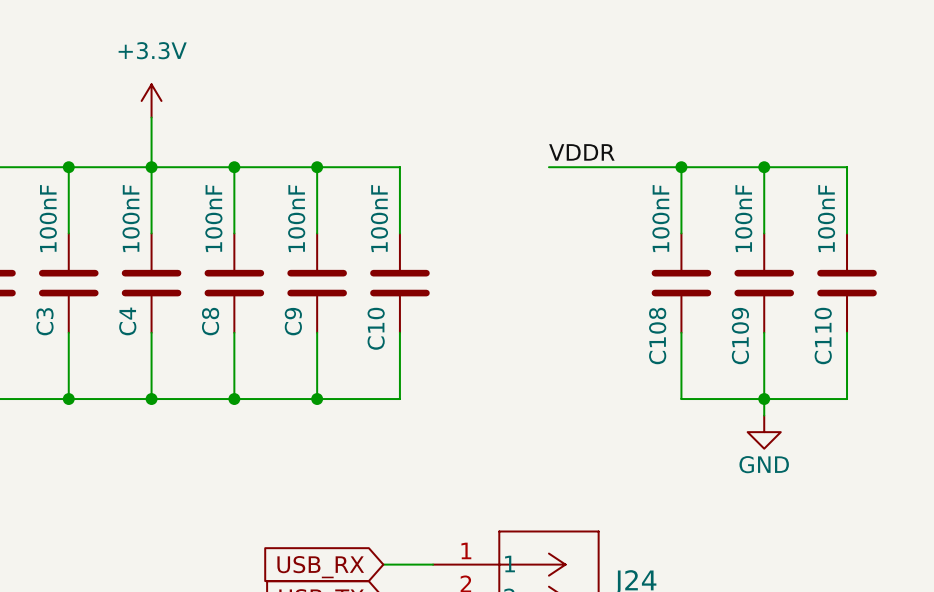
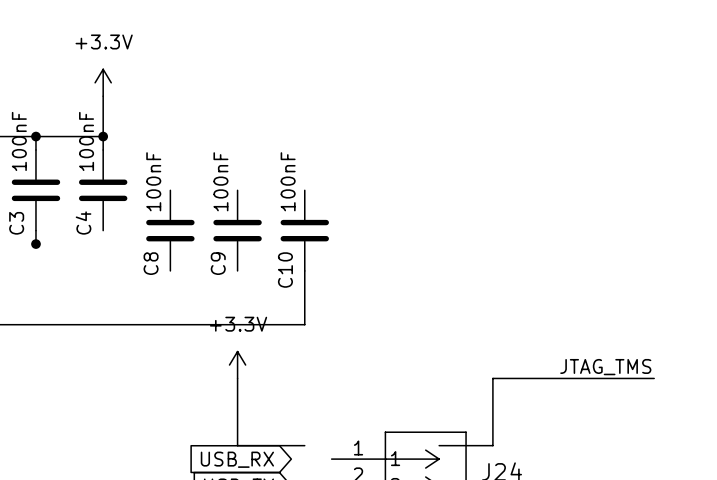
label: VDDR (581, 152) -> none
wire: (151, 167) (399, 167) (399, 233) -> none
wire: (234, 167) (234, 233) -> none
junction: (234, 167) -> none
wire: (317, 167) (317, 233) -> none
junction: (317, 167) -> none
wire: (548, 167) (847, 167) (847, 233) -> none
wire: (681, 167) (681, 233) -> none
junction: (681, 167) -> none
wire: (764, 167) (764, 233) -> none
junction: (764, 167) -> none
C3 position: (68, 283) -> (35, 190)
C4 position: (151, 283) -> (103, 190)
C108: 100nF (681, 283) -> none
C109: 100nF (764, 283) -> none
C110: 100nF (847, 283) -> none
junction: none -> (35, 244)
wire: (68, 332) (68, 399) -> none
wire: (151, 332) (151, 399) -> none
wire: (234, 332) (234, 399) -> none
wire: (317, 332) (317, 399) -> none
wire: (681, 332) (681, 399) (847, 399) (847, 332) -> none
wire: (764, 332) (764, 415) -> none
junction: (68, 399) -> none
junction: (151, 399) -> none
junction: (234, 399) -> none
junction: (317, 399) -> none
junction: (764, 399) -> none
power symbol: GND (764, 432) -> none
power symbol: none -> +3.3V (237, 365)
label: none -> JTAG_TMS (605, 367)
wire: none -> (237, 378) (237, 445) (304, 445)
wire: none -> (654, 378) (492, 378) (492, 445) (439, 445)
wire: (383, 564) (433, 564) -> none

